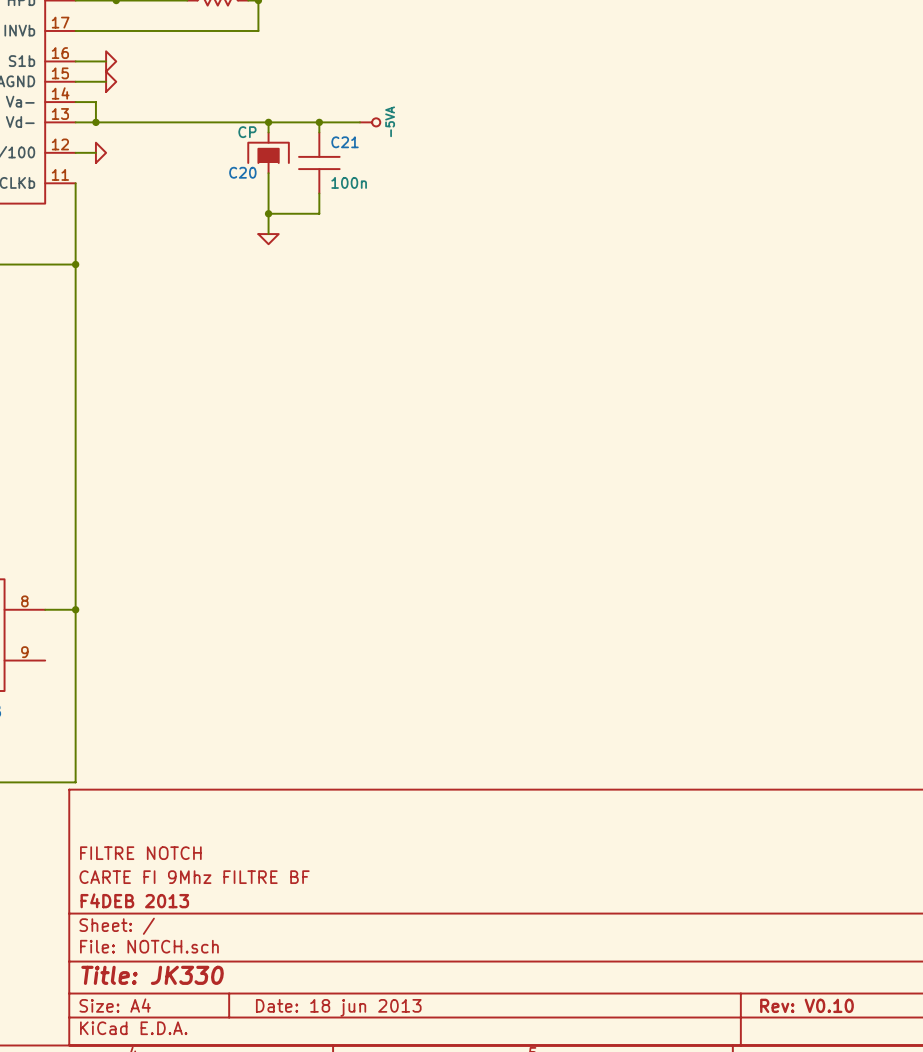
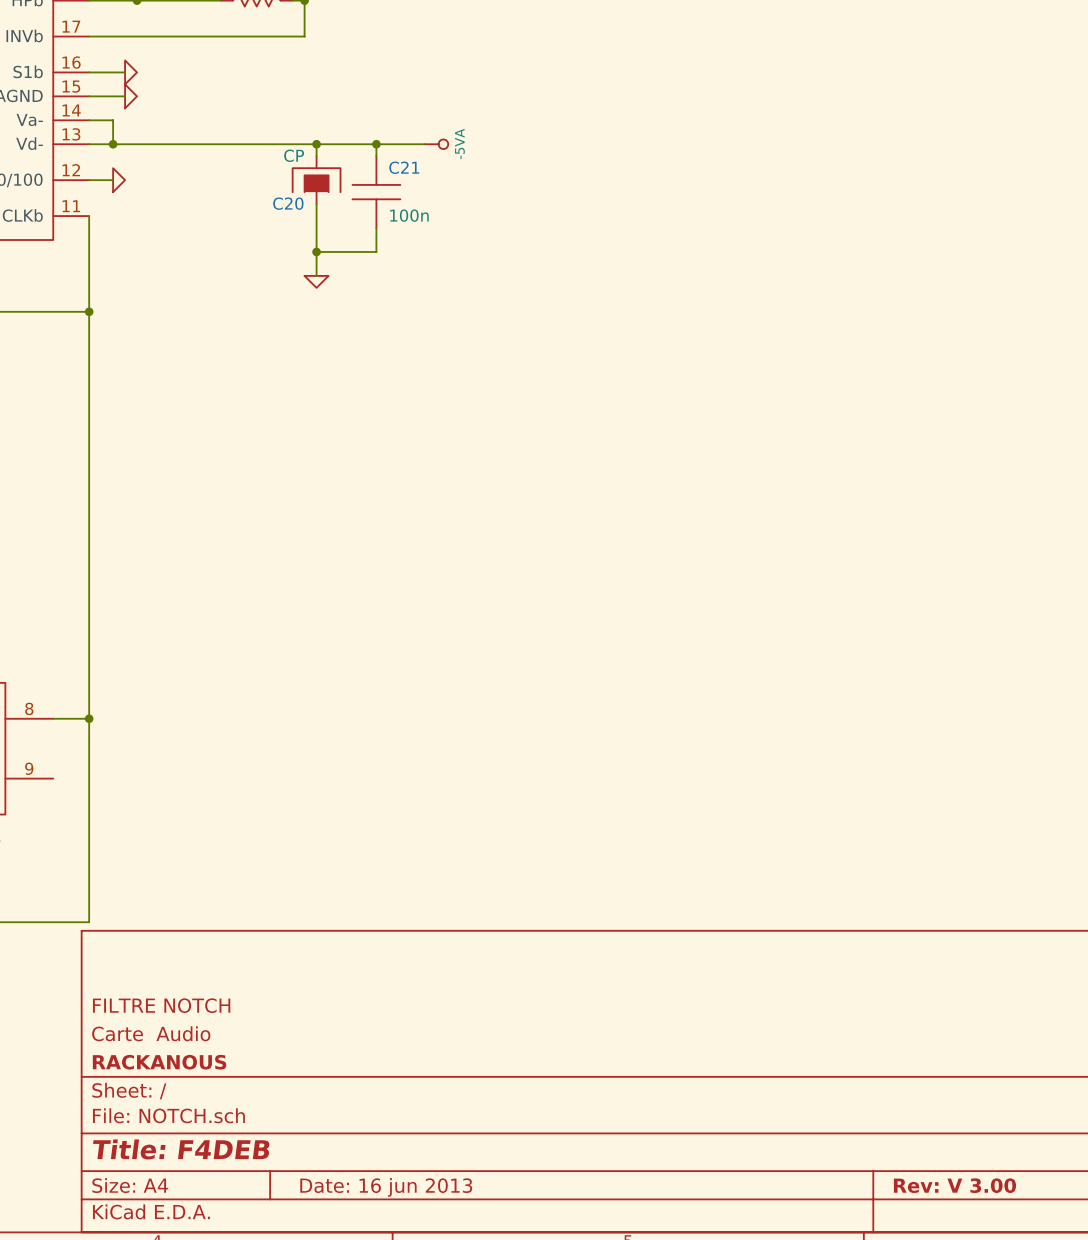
title block: CARTE FI 9Mhz FILTRE BF (194, 877) -> Carte Audio (151, 1033)
title block: F4DEB 2013 (134, 900) -> RACKANOUS (159, 1062)
title block: Title: JK330 (152, 975) -> Title: F4DEB (181, 1149)
title block: Rev: V0.10 (806, 1005) -> Rev: V 3.00 (954, 1185)
title block: Date: 18 jun 2013 (338, 1007) -> Date: 16 jun 2013 (386, 1187)

